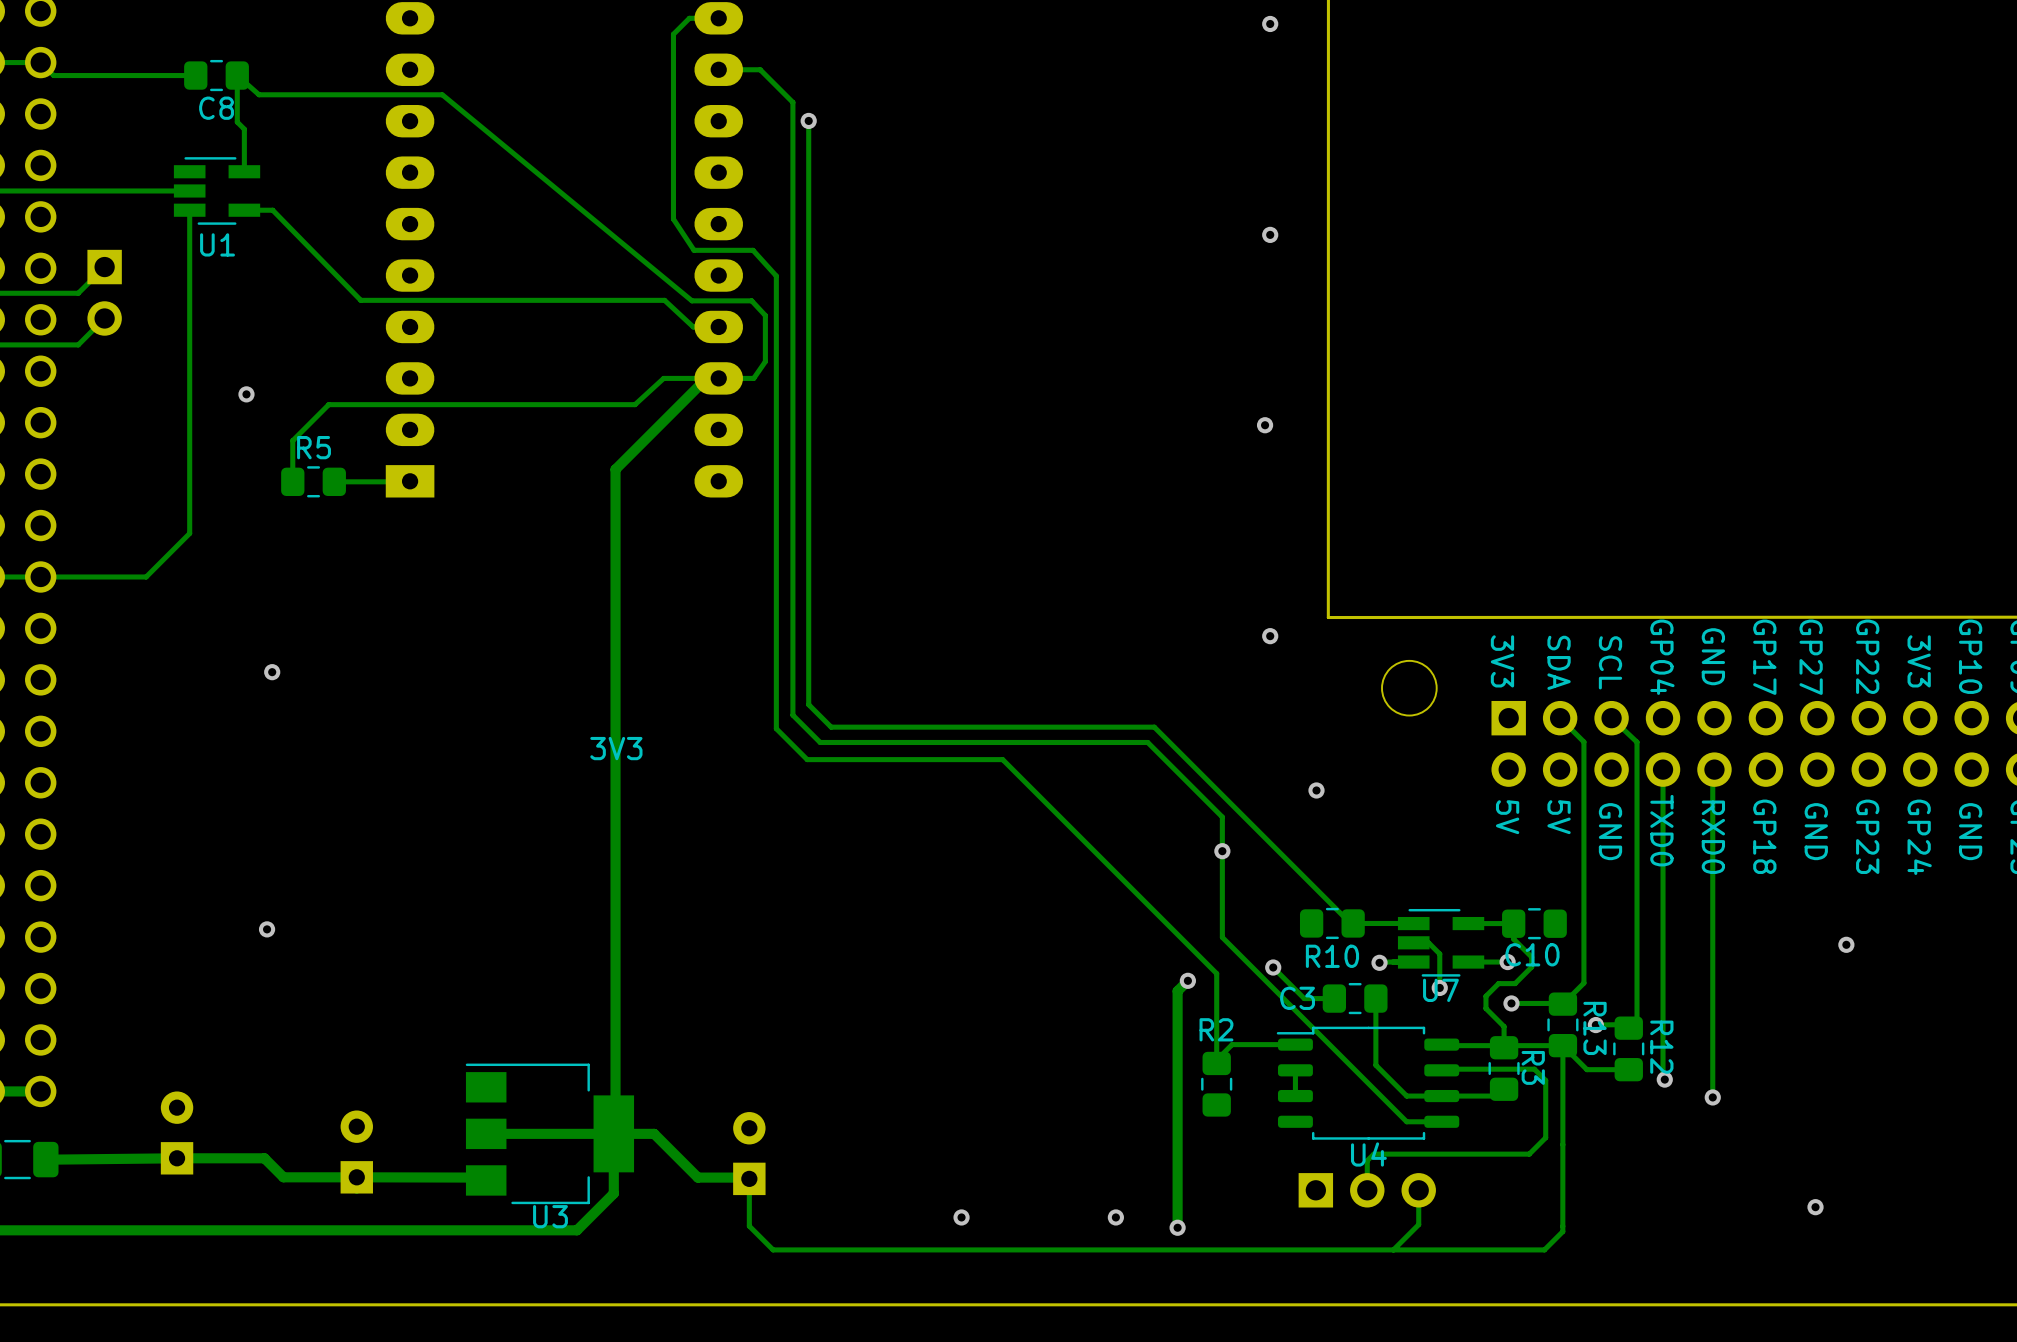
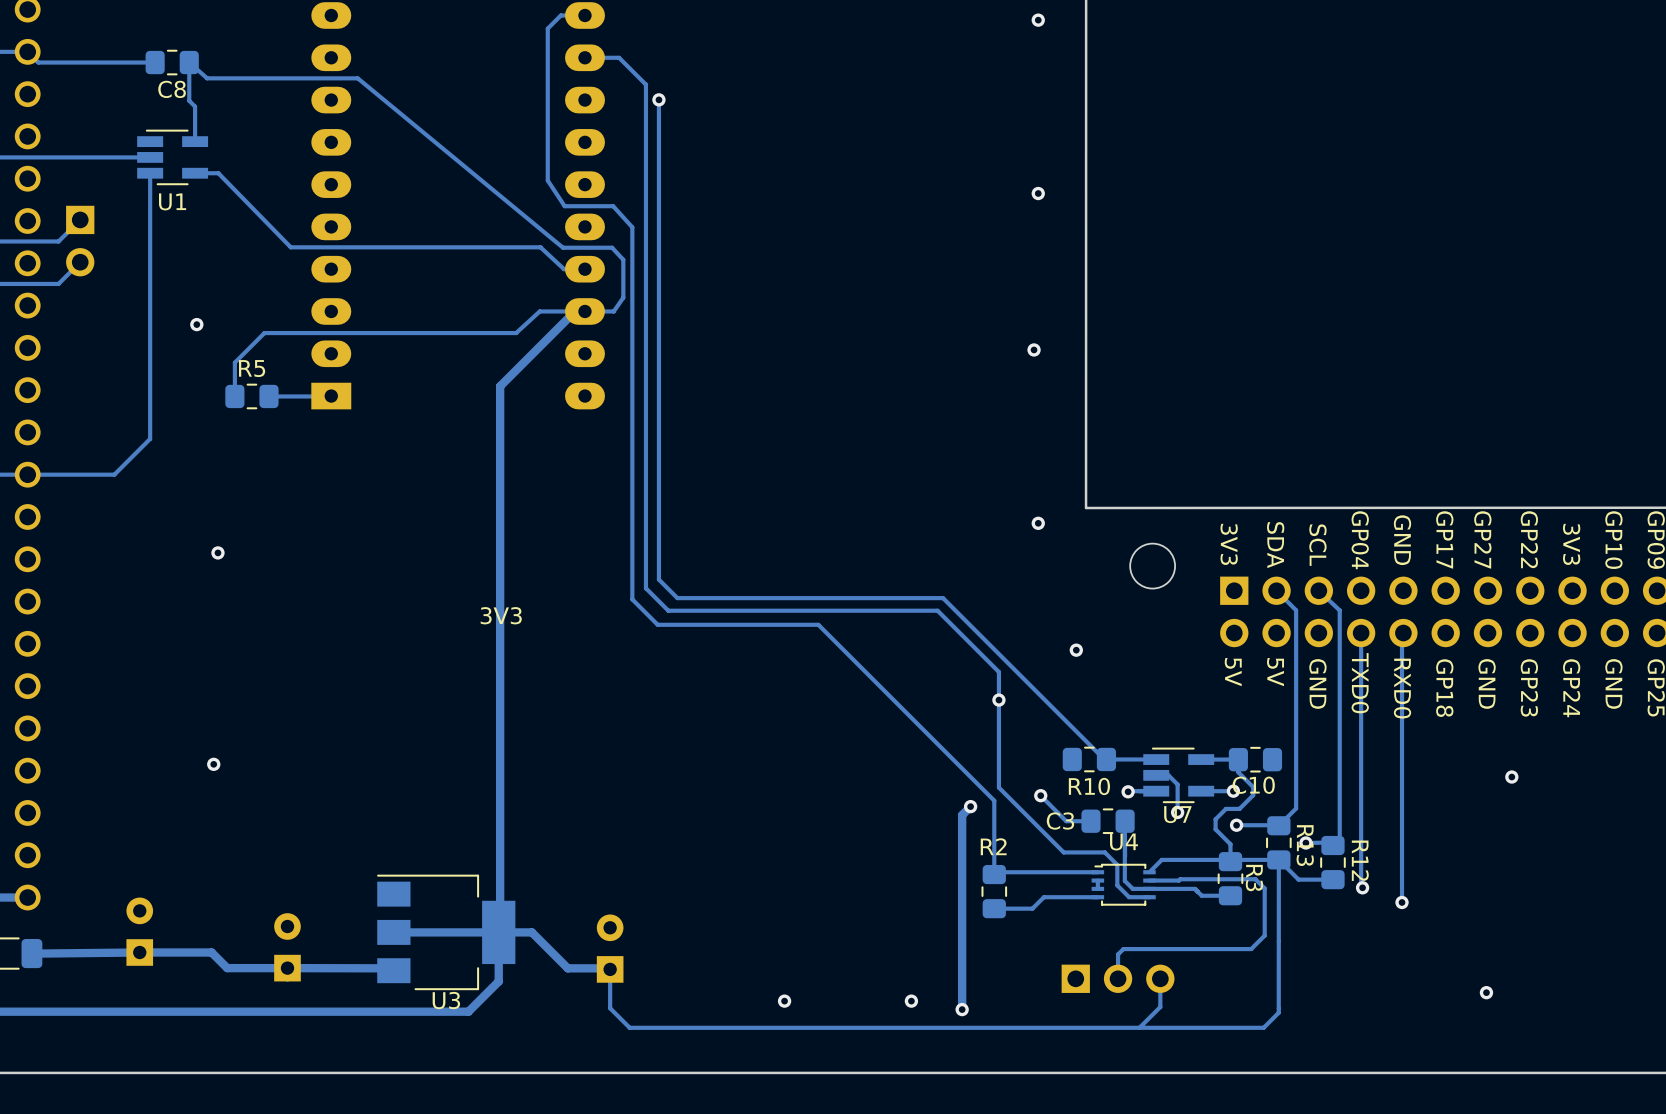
track: (1222, 937) (1406, 1121) (1441, 1121) -> (998, 770) (998, 787) (1063, 852) (1104, 852) (1117, 864) (1117, 885) (1129, 897) (1149, 897)
track: (1375, 998) (1375, 1065) (1406, 1096) (1495, 1096) (1504, 1087) -> none
U4 footprint: [1276, 1026, 1460, 1140] -> [1091, 863, 1156, 906]
track: none -> (1125, 856) (1124, 820) (1124, 880) (1132, 888) (1194, 888) (1201, 895) (1230, 895)
track: (1295, 1044) (1232, 1044) (1216, 1060) -> none
track: none -> (1193, 859) (1161, 859) (1149, 872)
track: none -> (1097, 872) (996, 872) (994, 874)
track: (1295, 1070) (1295, 1096) -> none
track: none -> (1097, 880) (1097, 888)
track: none -> (1179, 880) (1149, 880)
track: none -> (1097, 897) (1043, 897) (1032, 908) (994, 908)
U4 name position: U4 (1368, 1154) -> U4 (1124, 841)

